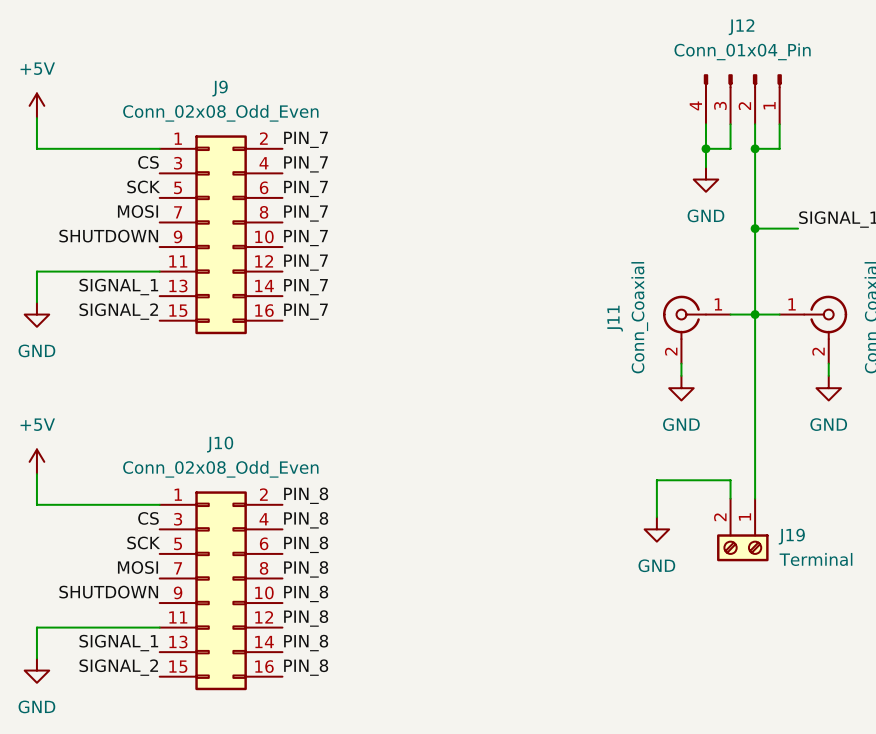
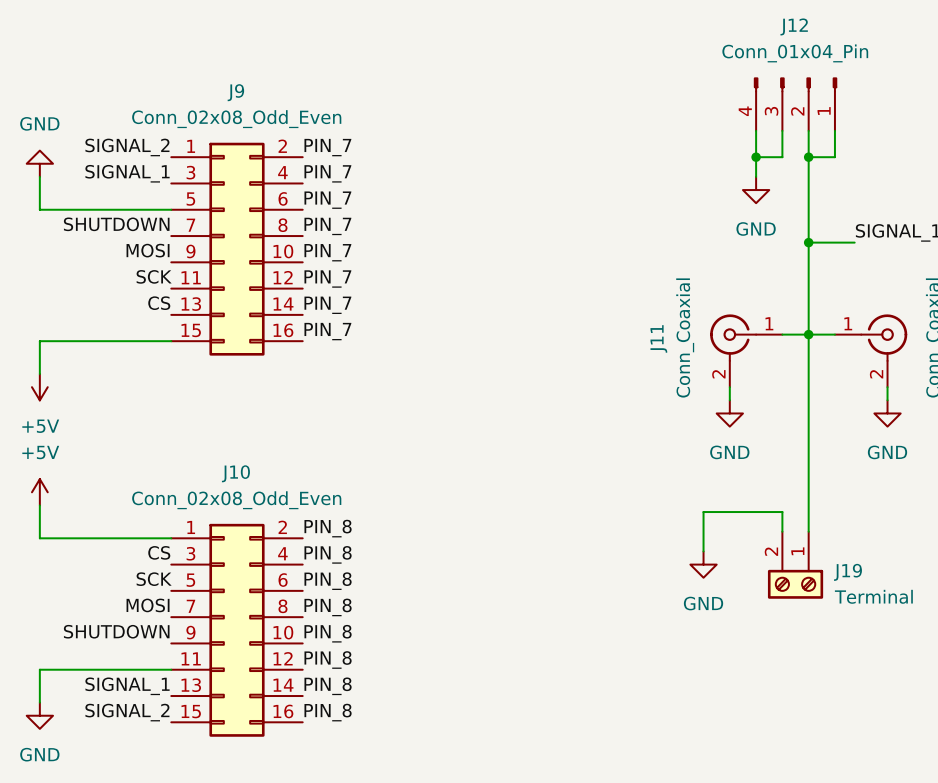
power symbol: +5V (36, 105) -> none
wire: (36, 118) (36, 148) (159, 148) -> (39, 176) (39, 209) (171, 209)
label: CS (148, 162) -> SIGNAL_1 (127, 173)
label position: SCK (143, 186) -> SCK (154, 276)
label: MOSI (137, 211) -> SHUTDOWN (116, 224)
label: SHUTDOWN (108, 236) -> MOSI (148, 250)
wire: (159, 271) (36, 271) (36, 302) -> (171, 341) (39, 341) (39, 374)
label: SIGNAL_1 (118, 287) -> CS (159, 303)
label position: SIGNAL_2 (118, 311) -> SIGNAL_2 (127, 147)
power symbol rotation: 0° (36, 314) -> 180° (39, 163)
power symbol position: GND (36, 314) -> GND (39, 163)
power symbol: none -> +5V (39, 387)

